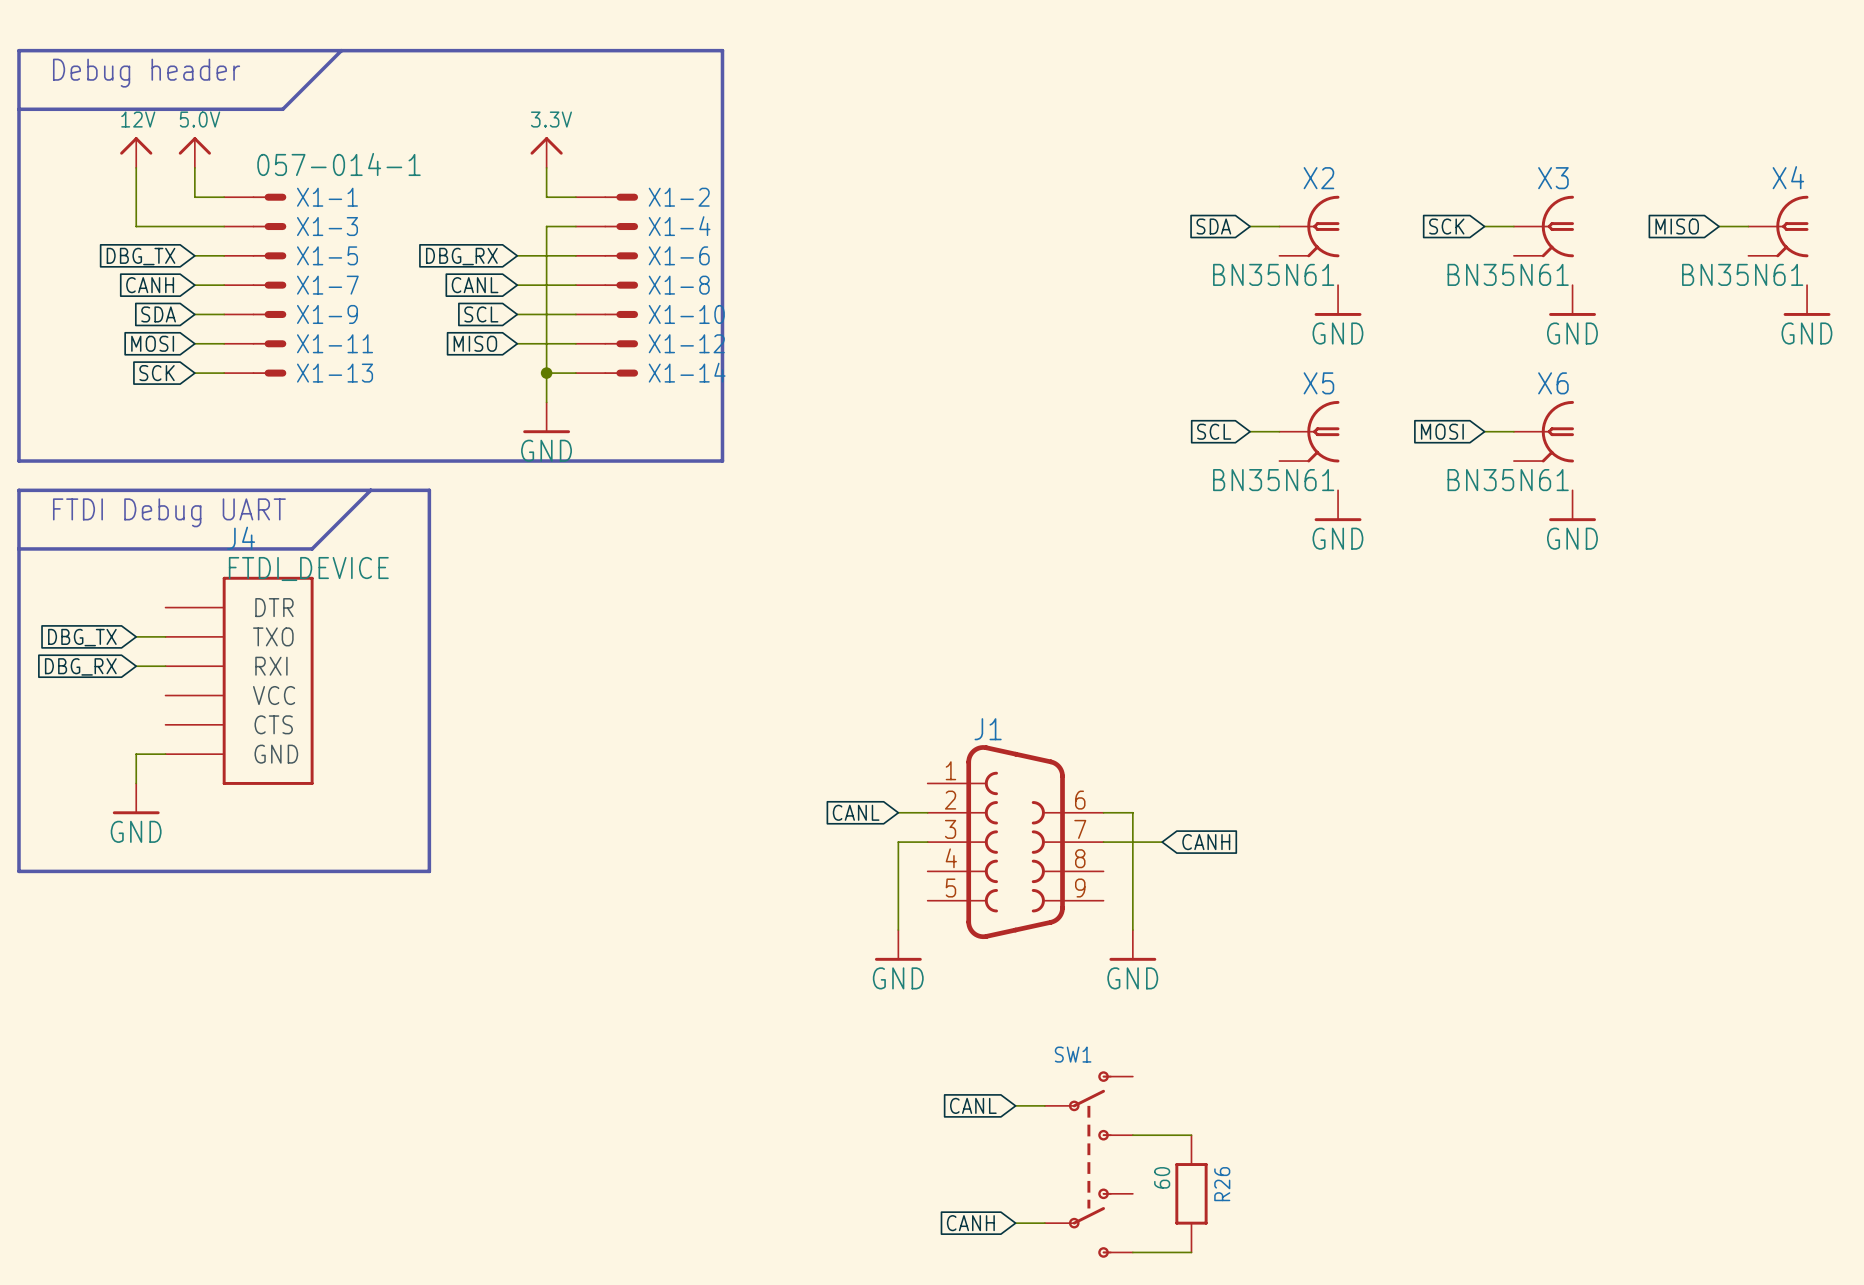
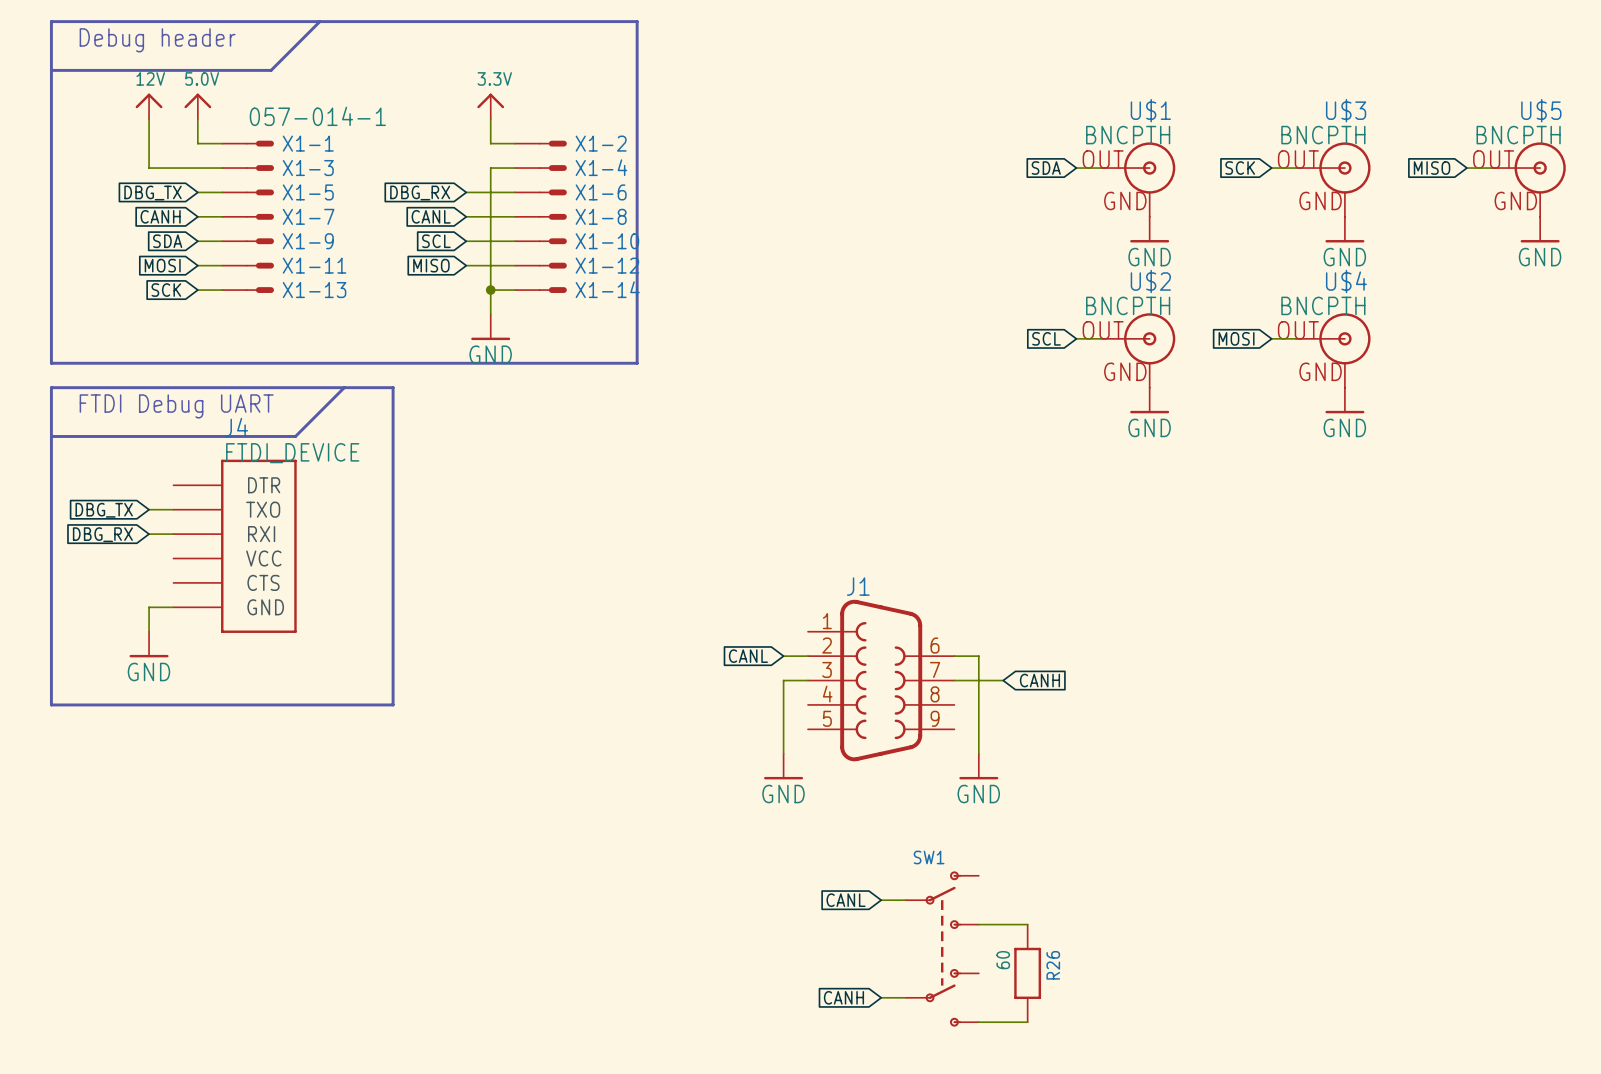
X2: BN35N61 (1309, 226) -> none
X3: BN35N61 (1543, 226) -> none
X4: BN35N61 (1778, 226) -> none
U$1: none -> BNCPTH (1138, 179)
U$3: none -> BNCPTH (1333, 179)
U$5: none -> BNCPTH (1528, 179)
X5: BN35N61 (1309, 431) -> none
X6: BN35N61 (1543, 431) -> none
U$2: none -> BNCPTH (1138, 350)
U$4: none -> BNCPTH (1333, 350)

